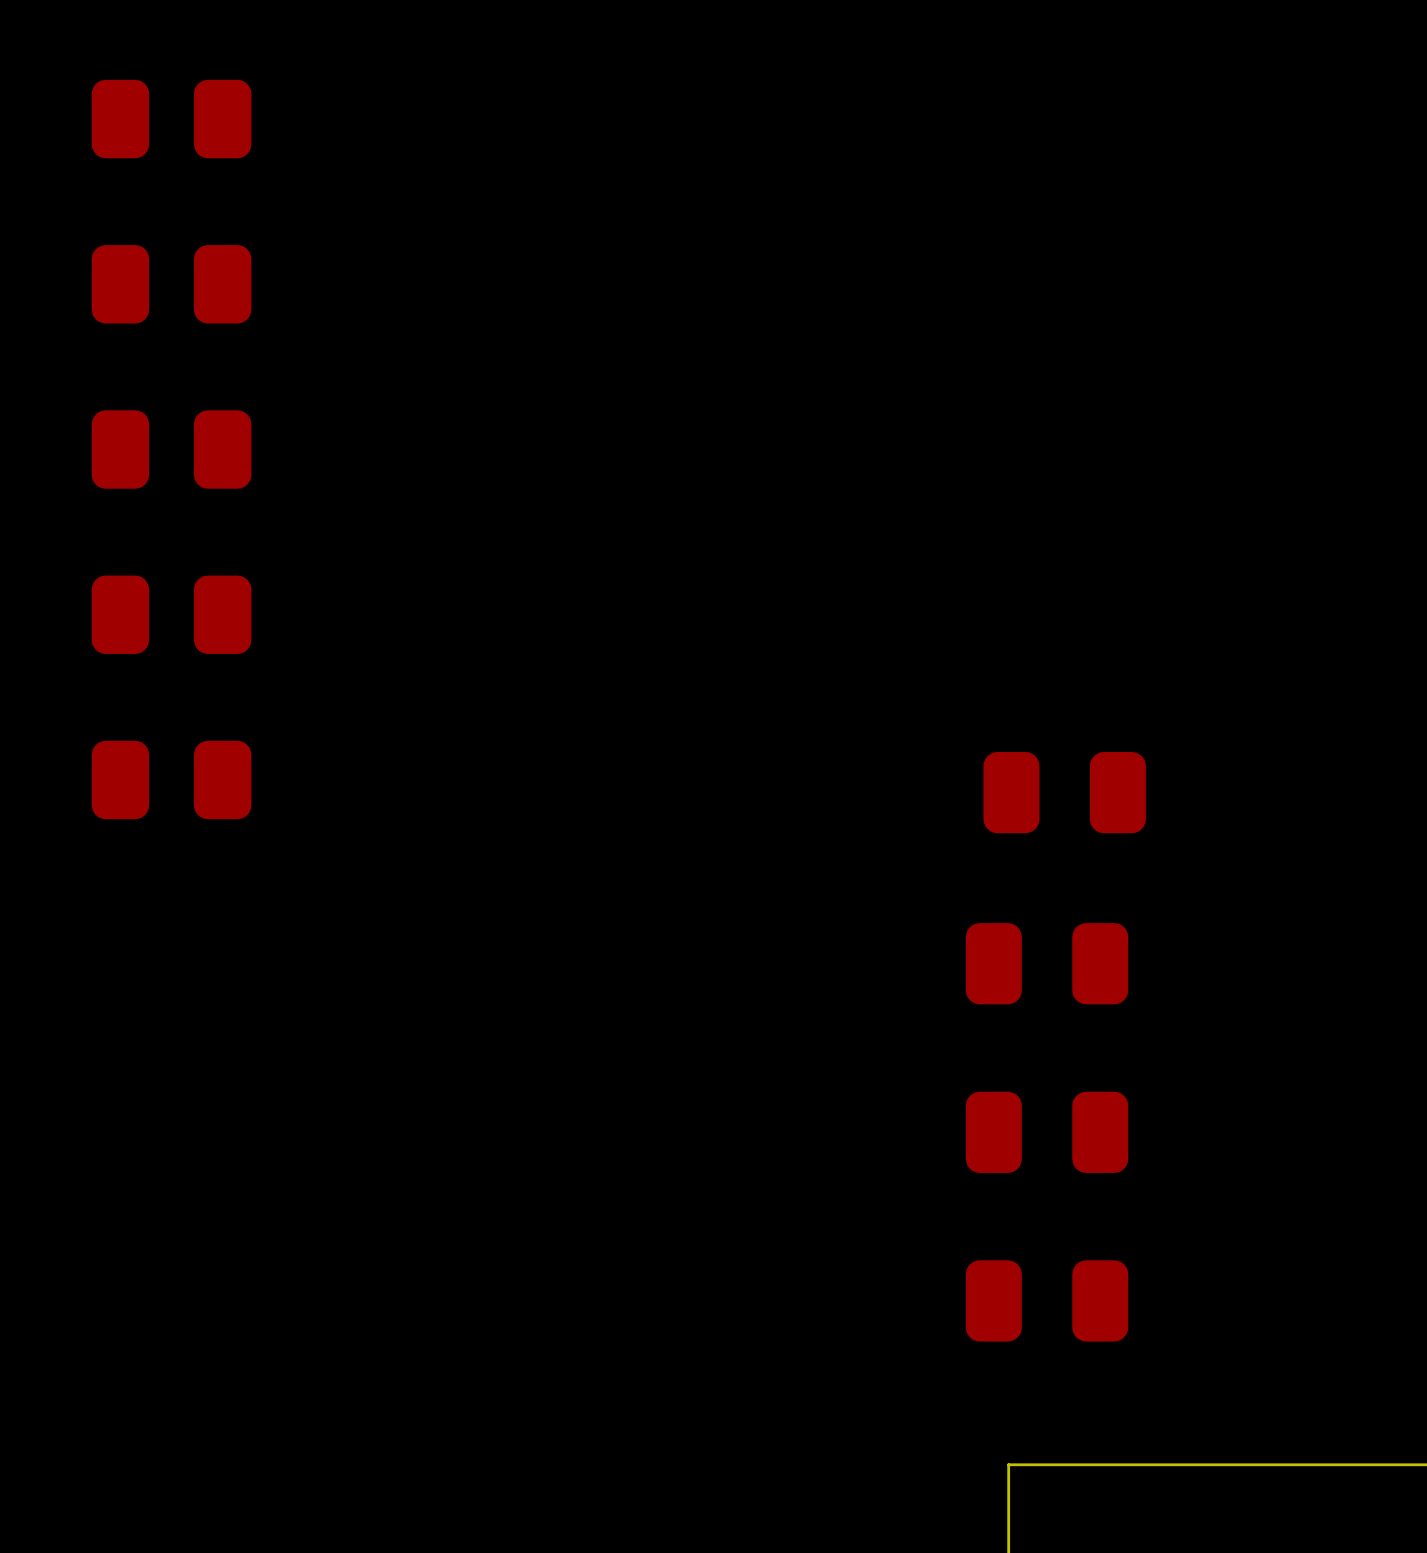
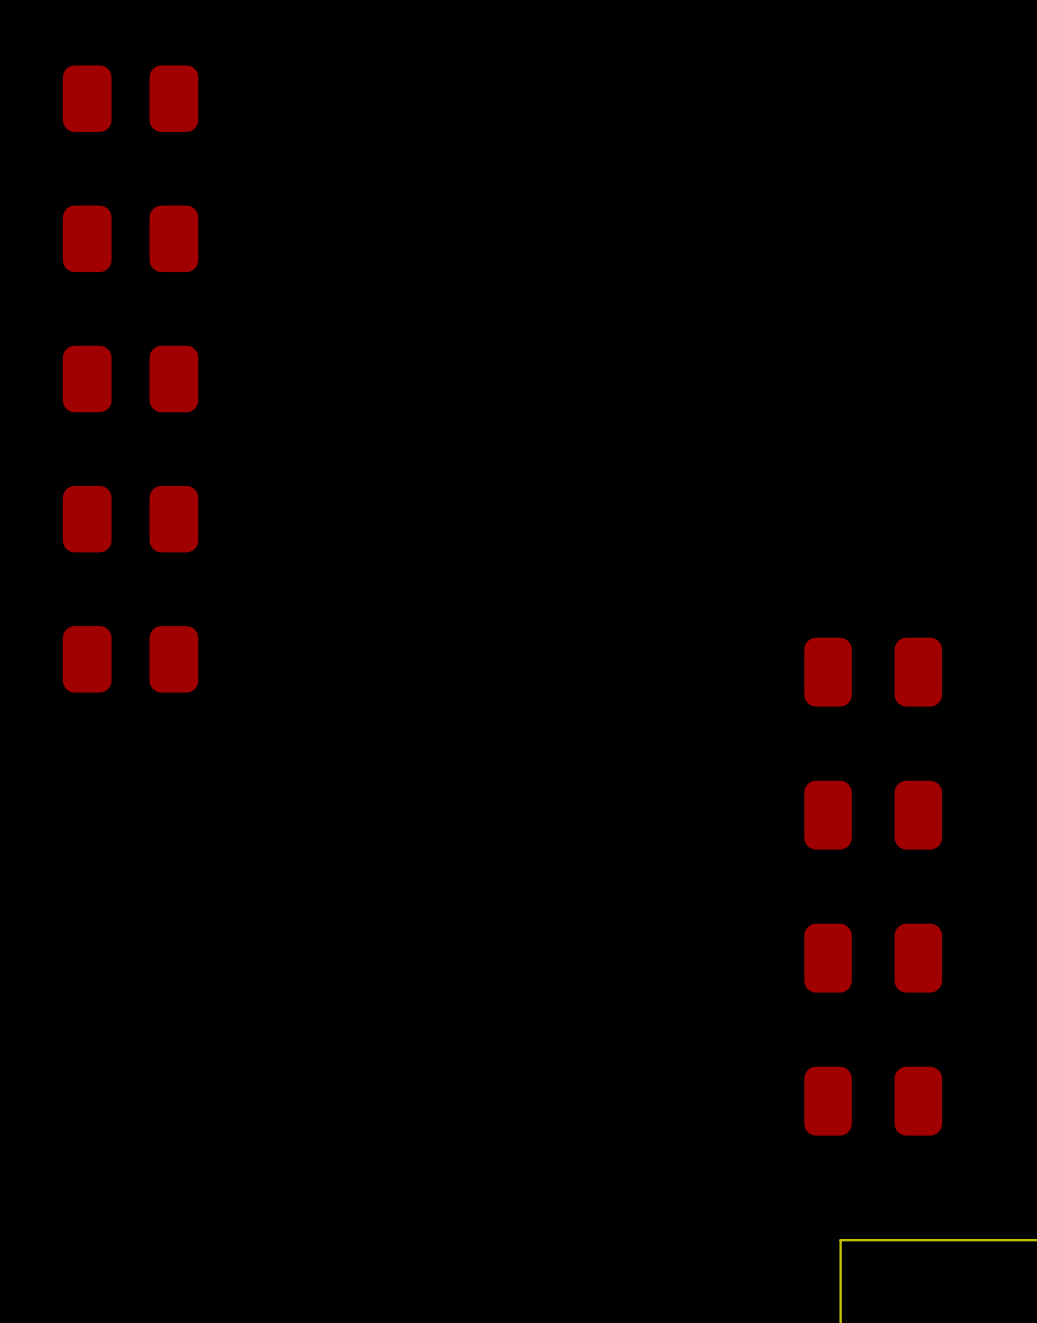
part position: (1064, 792) -> (873, 672)

